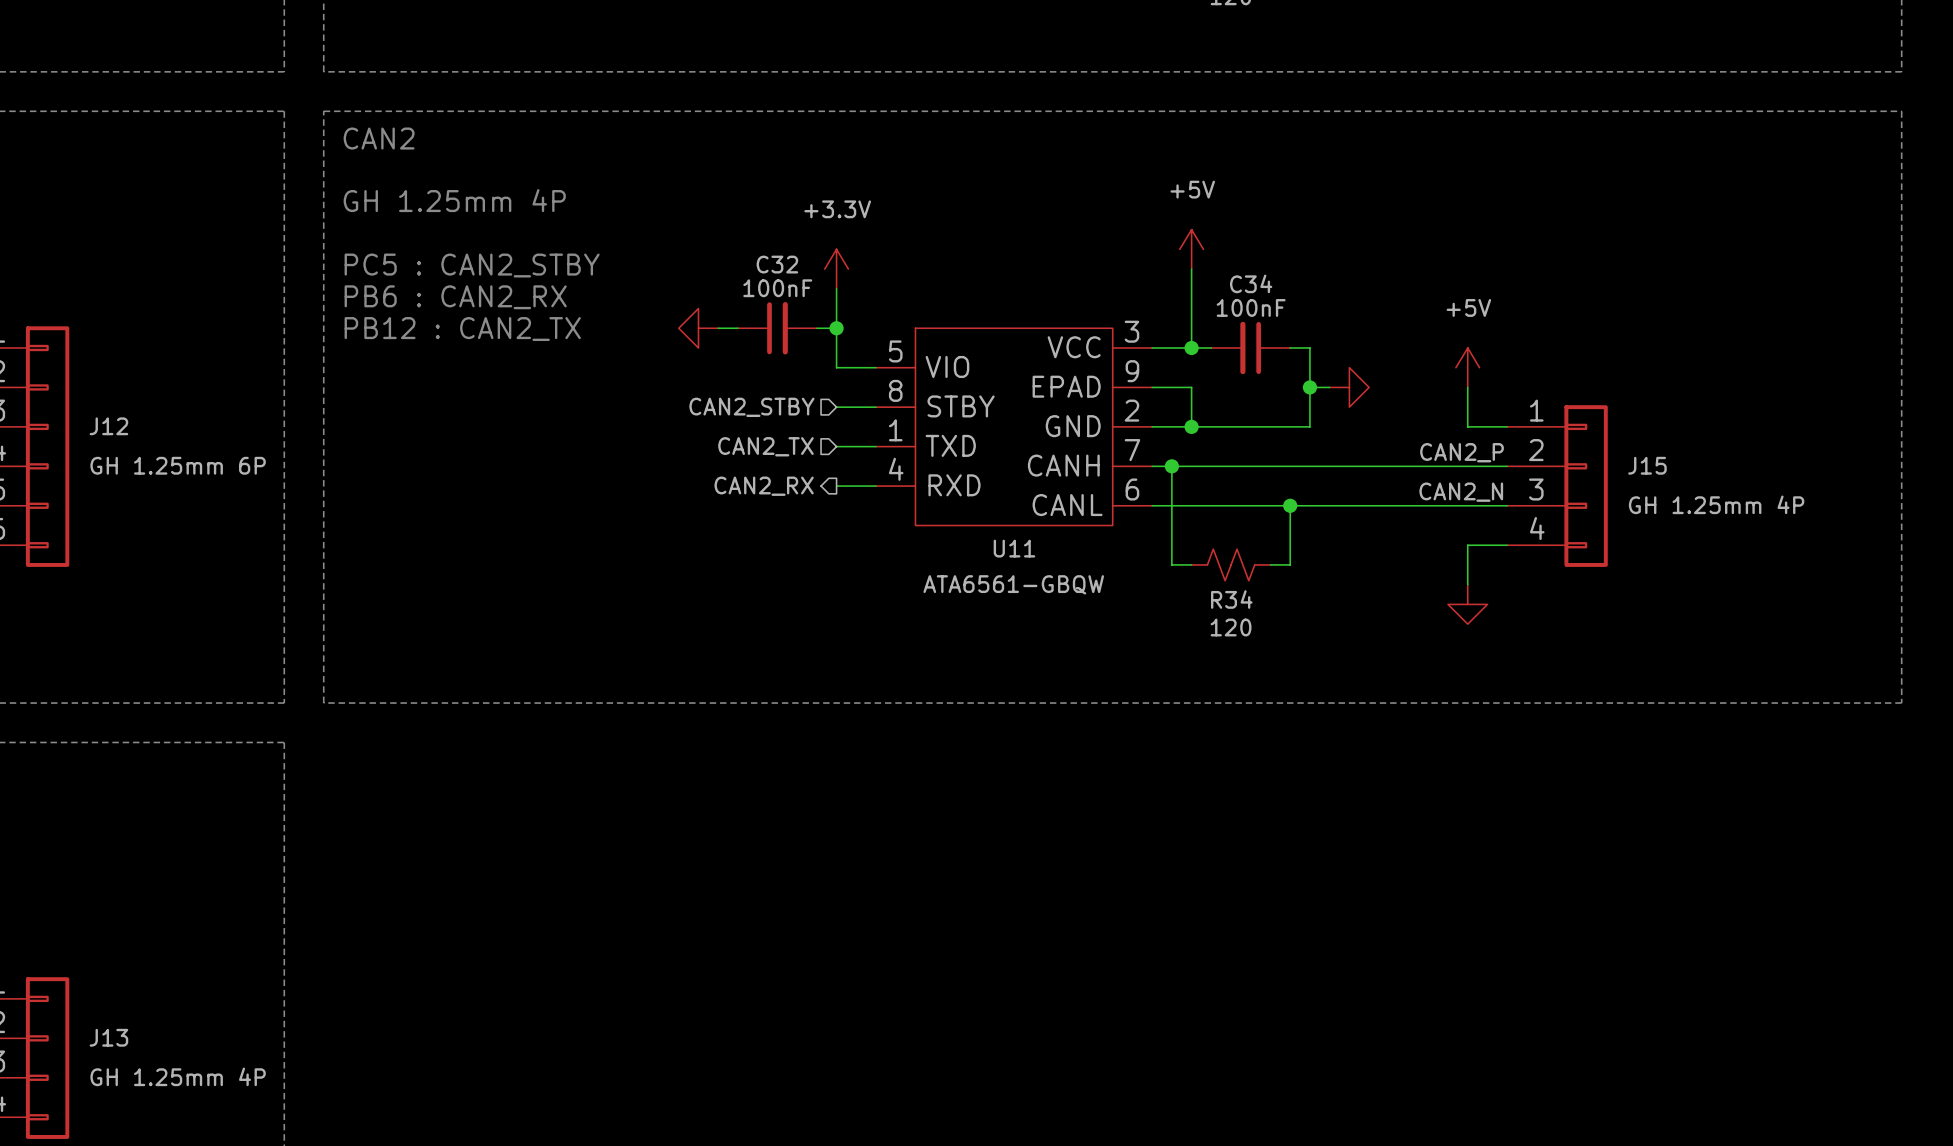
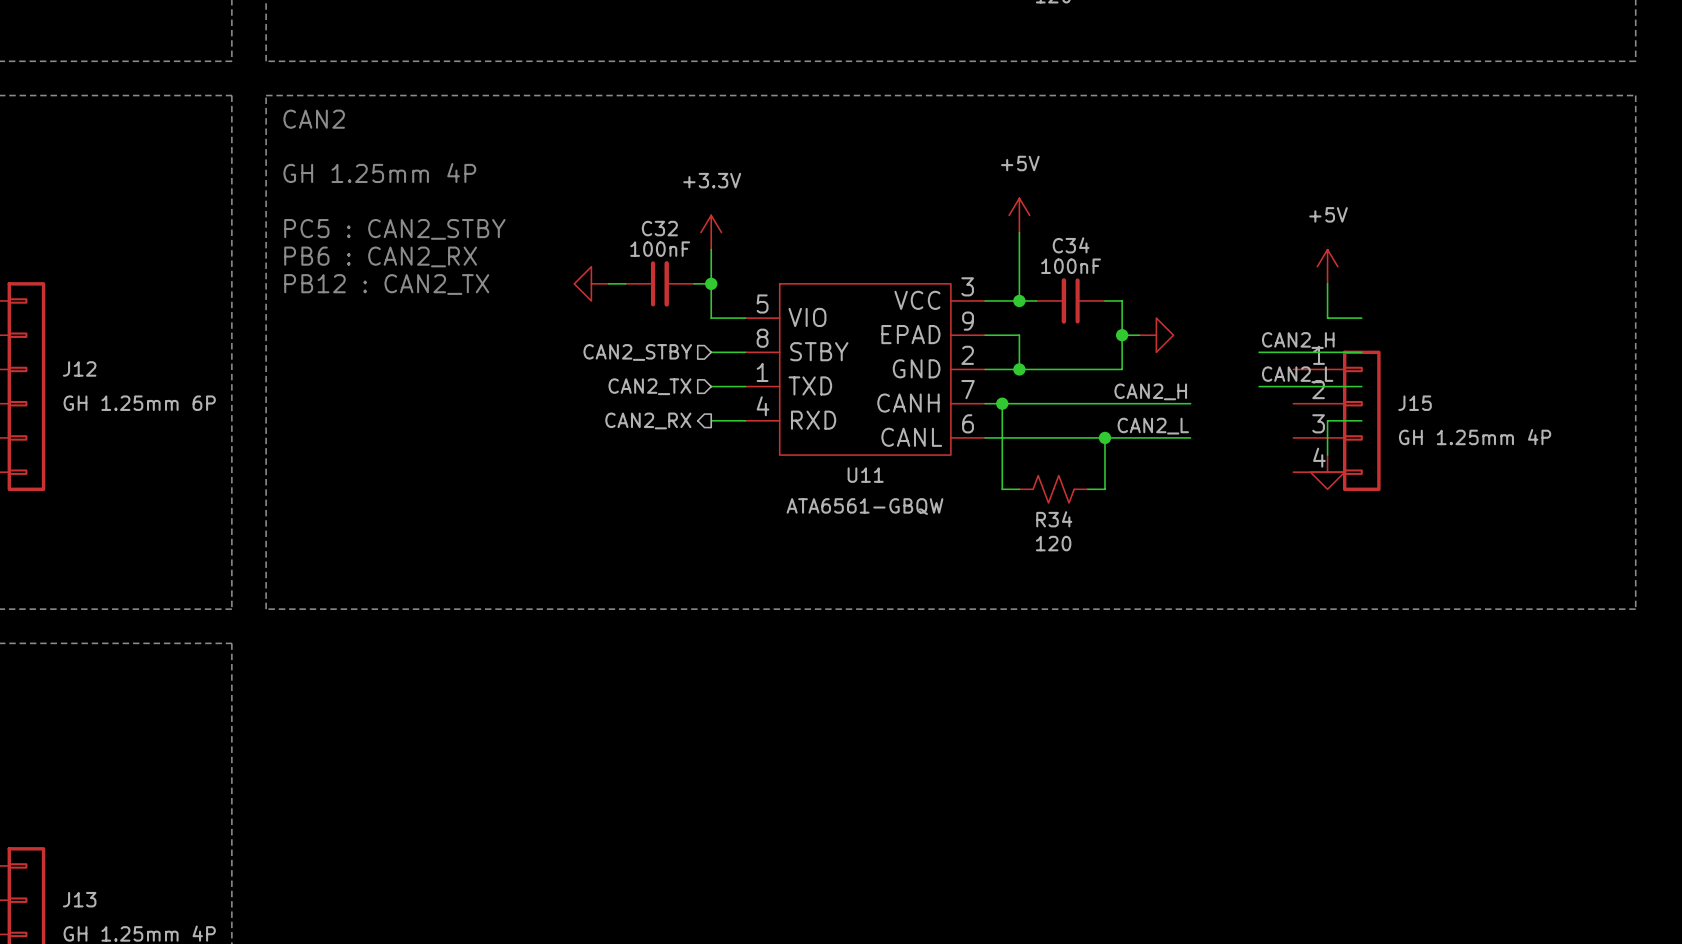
power symbol position: +5V (1467, 367) -> +5V (1327, 266)
wire: (1467, 387) (1467, 426) (1507, 426) -> (1327, 283) (1327, 318) (1361, 318)
label: none -> CAN2_H (1298, 340)
label: none -> CAN2_H (1150, 391)
label: CAN2_P (1462, 452) -> CAN2_L (1297, 374)
wire: (1388, 466) (1507, 466) -> (1259, 352) (1361, 352)
label: none -> CAN2_L (1153, 426)
label: CAN2_N (1461, 492) -> none
wire: (1388, 505) (1507, 505) -> (1259, 386) (1361, 386)
wire: (1507, 545) (1467, 545) (1467, 584) -> (1361, 420) (1327, 420) (1327, 455)
power symbol position: (1467, 604) -> (1327, 472)

